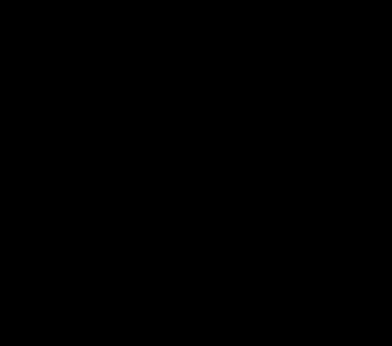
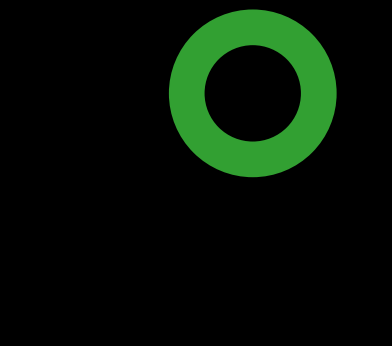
part: none -> (252, 93)

